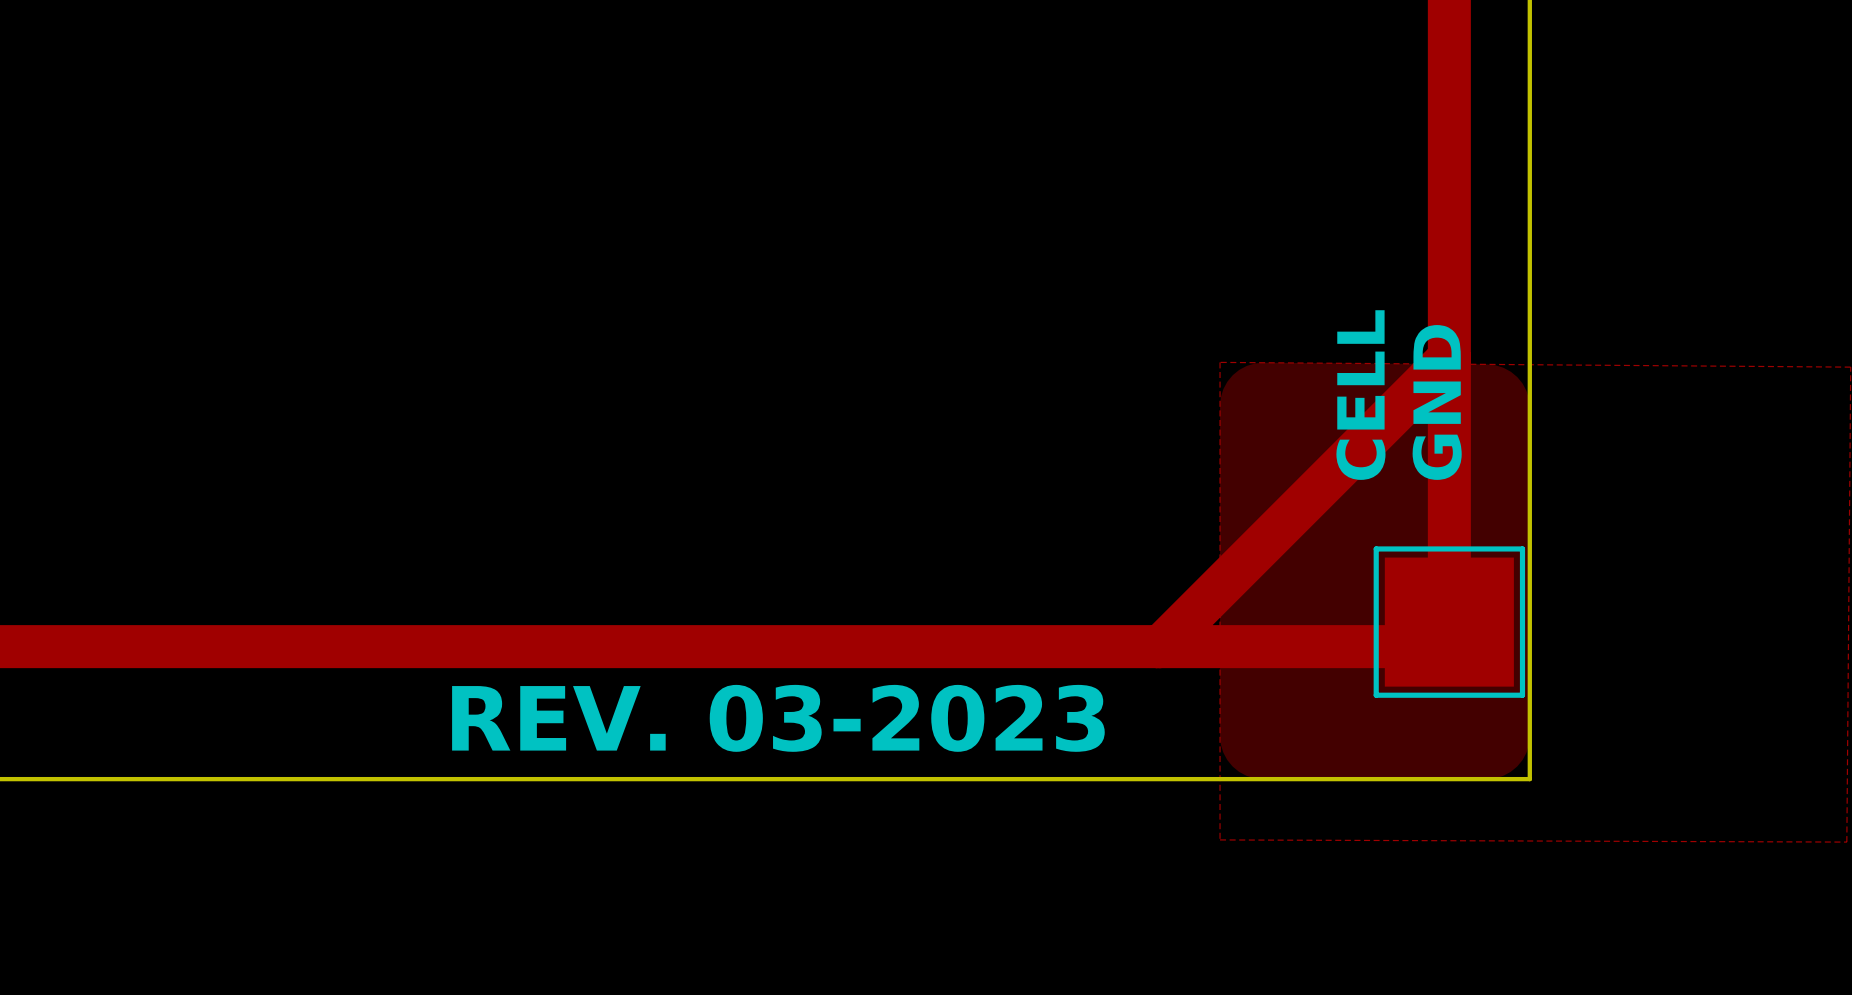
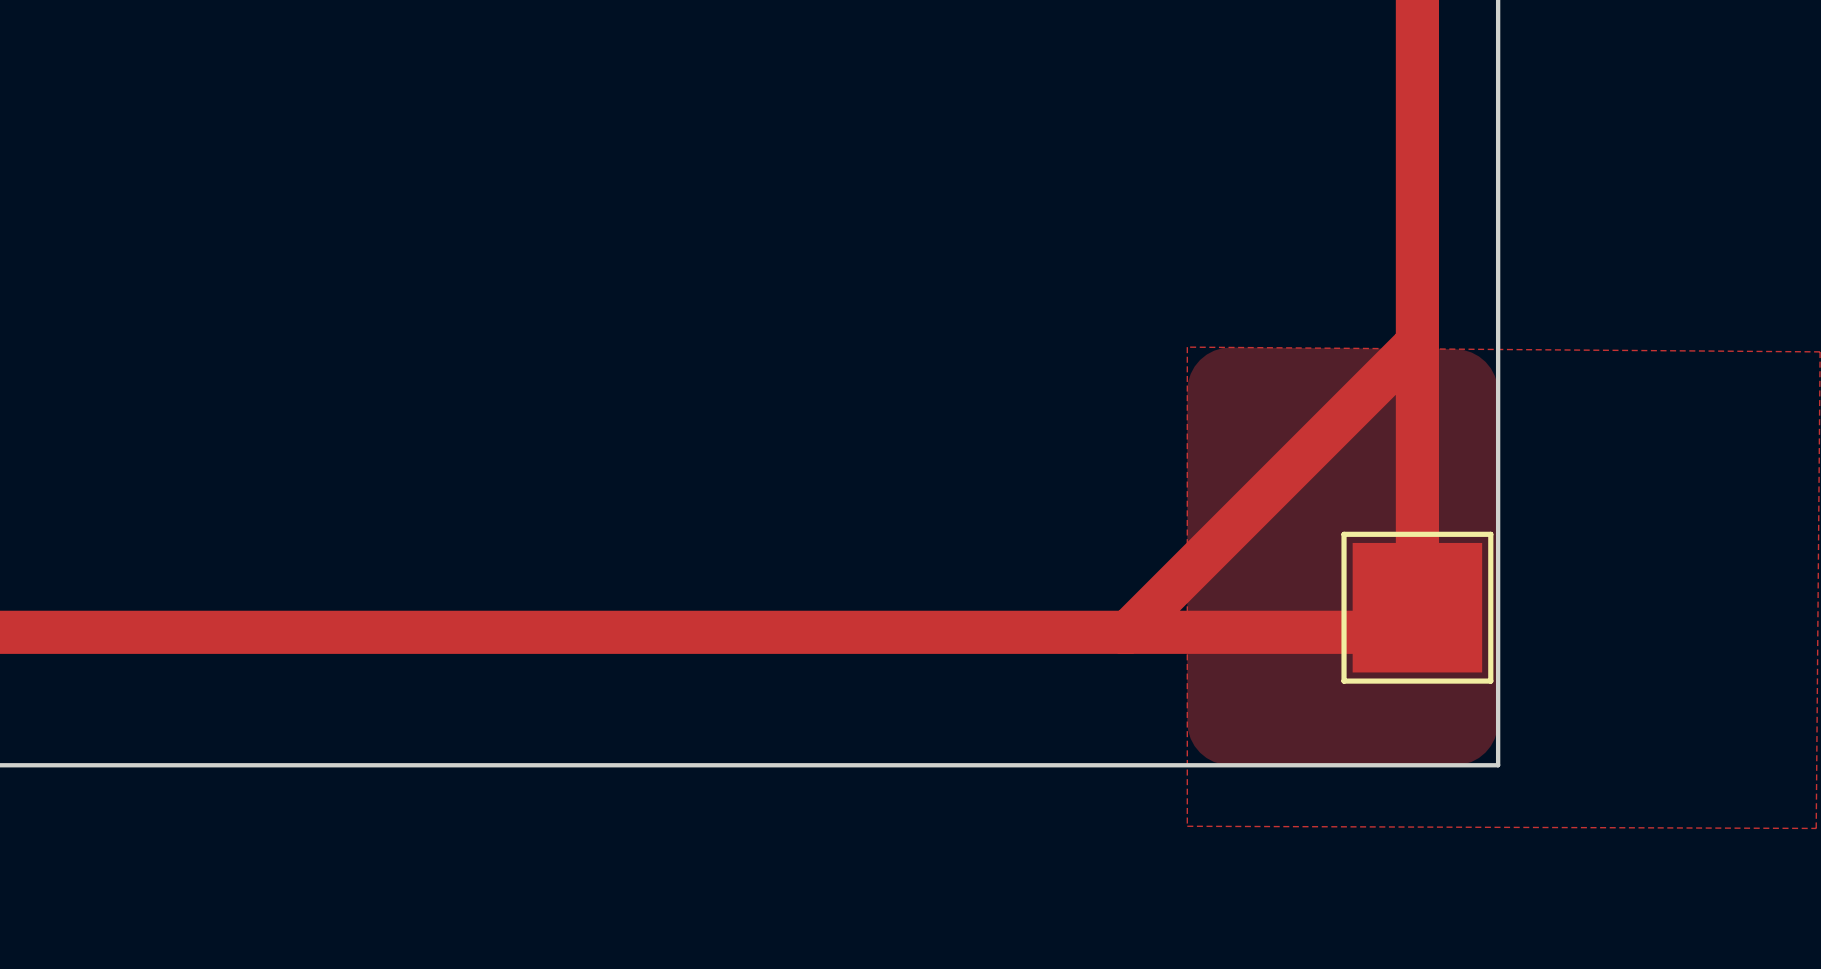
text: CELL (1360, 395) -> none
text: GND (1437, 402) -> none
text: REV. 03-2023 (778, 718) -> none

